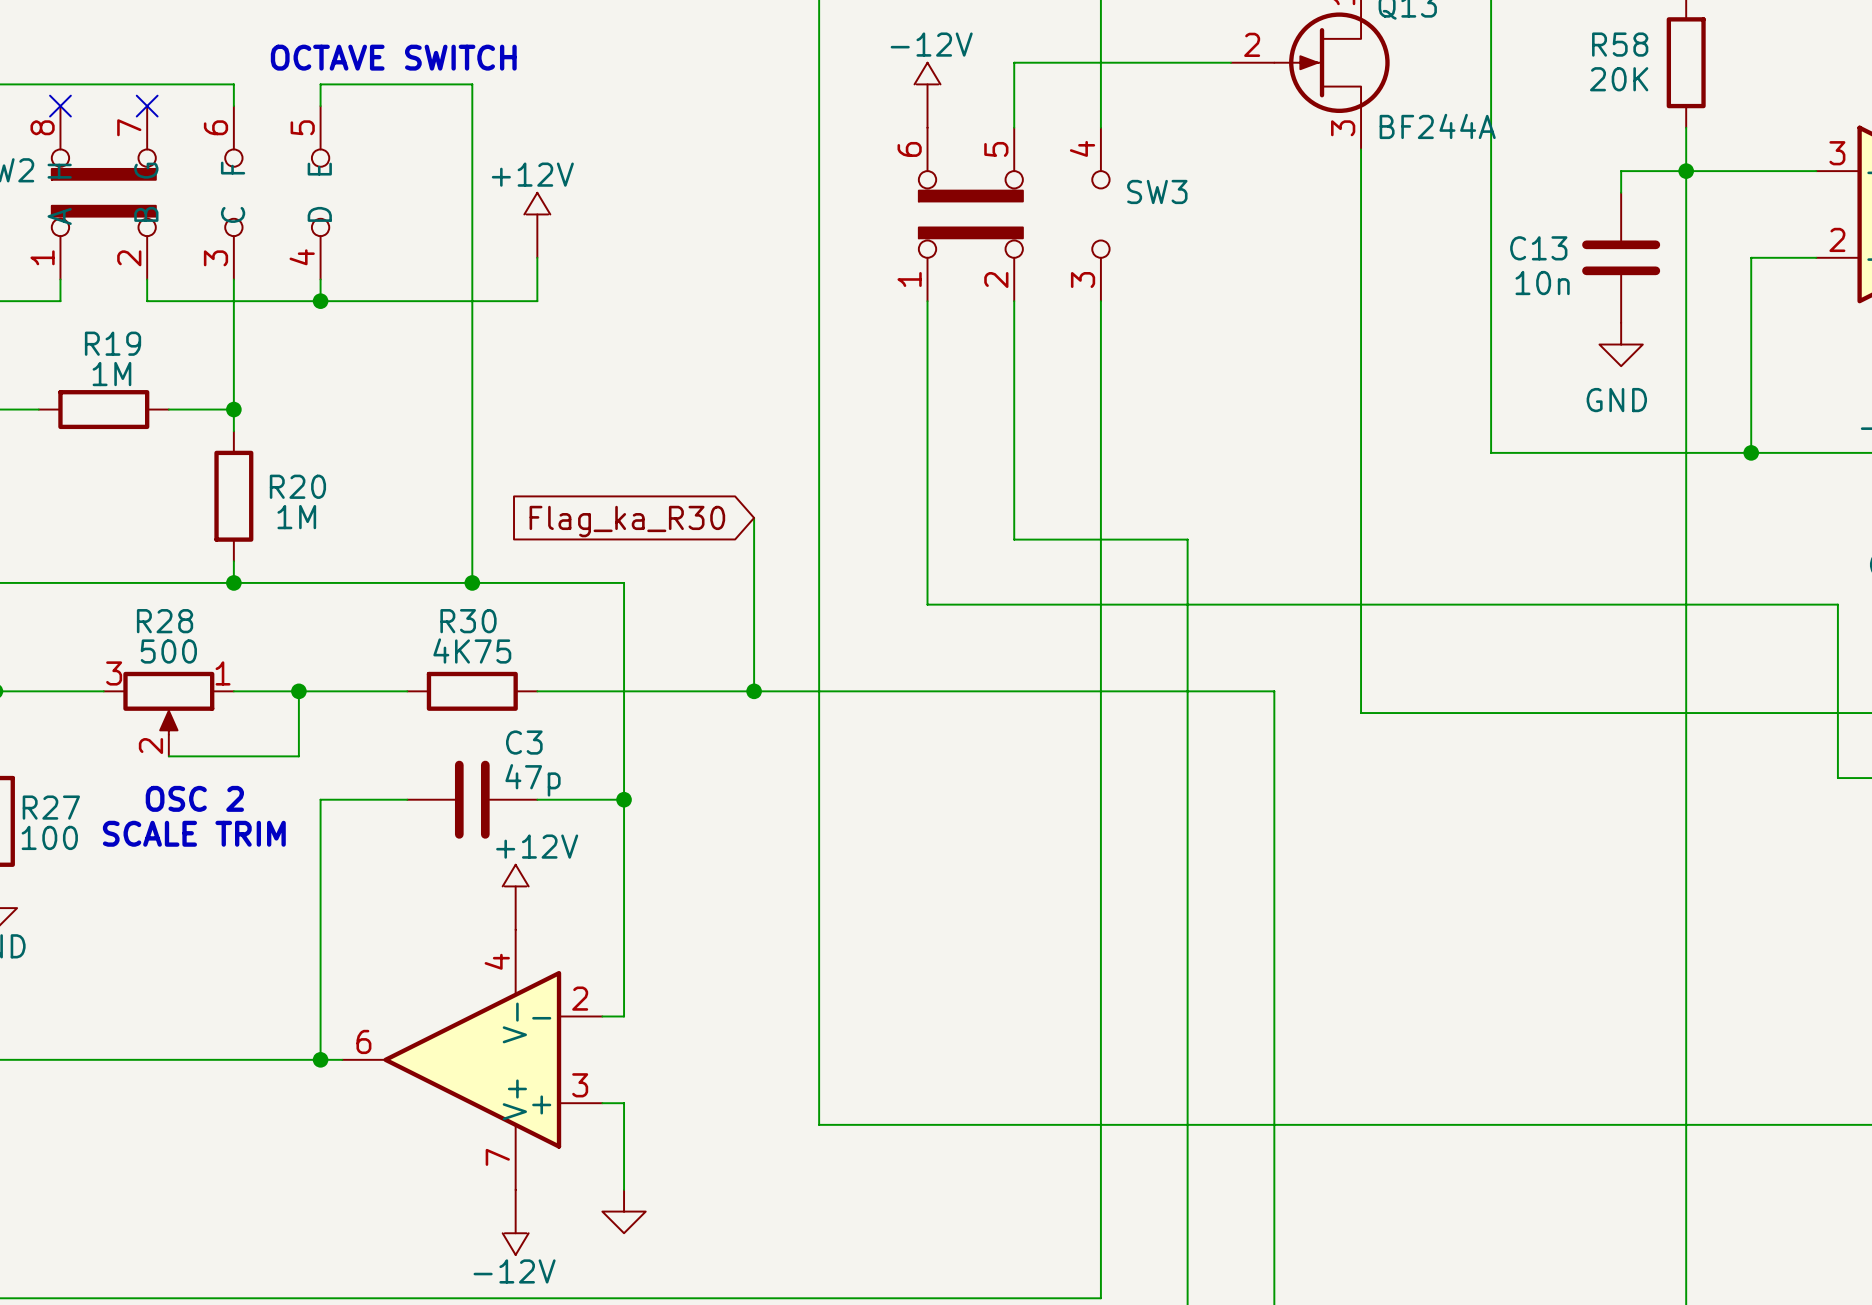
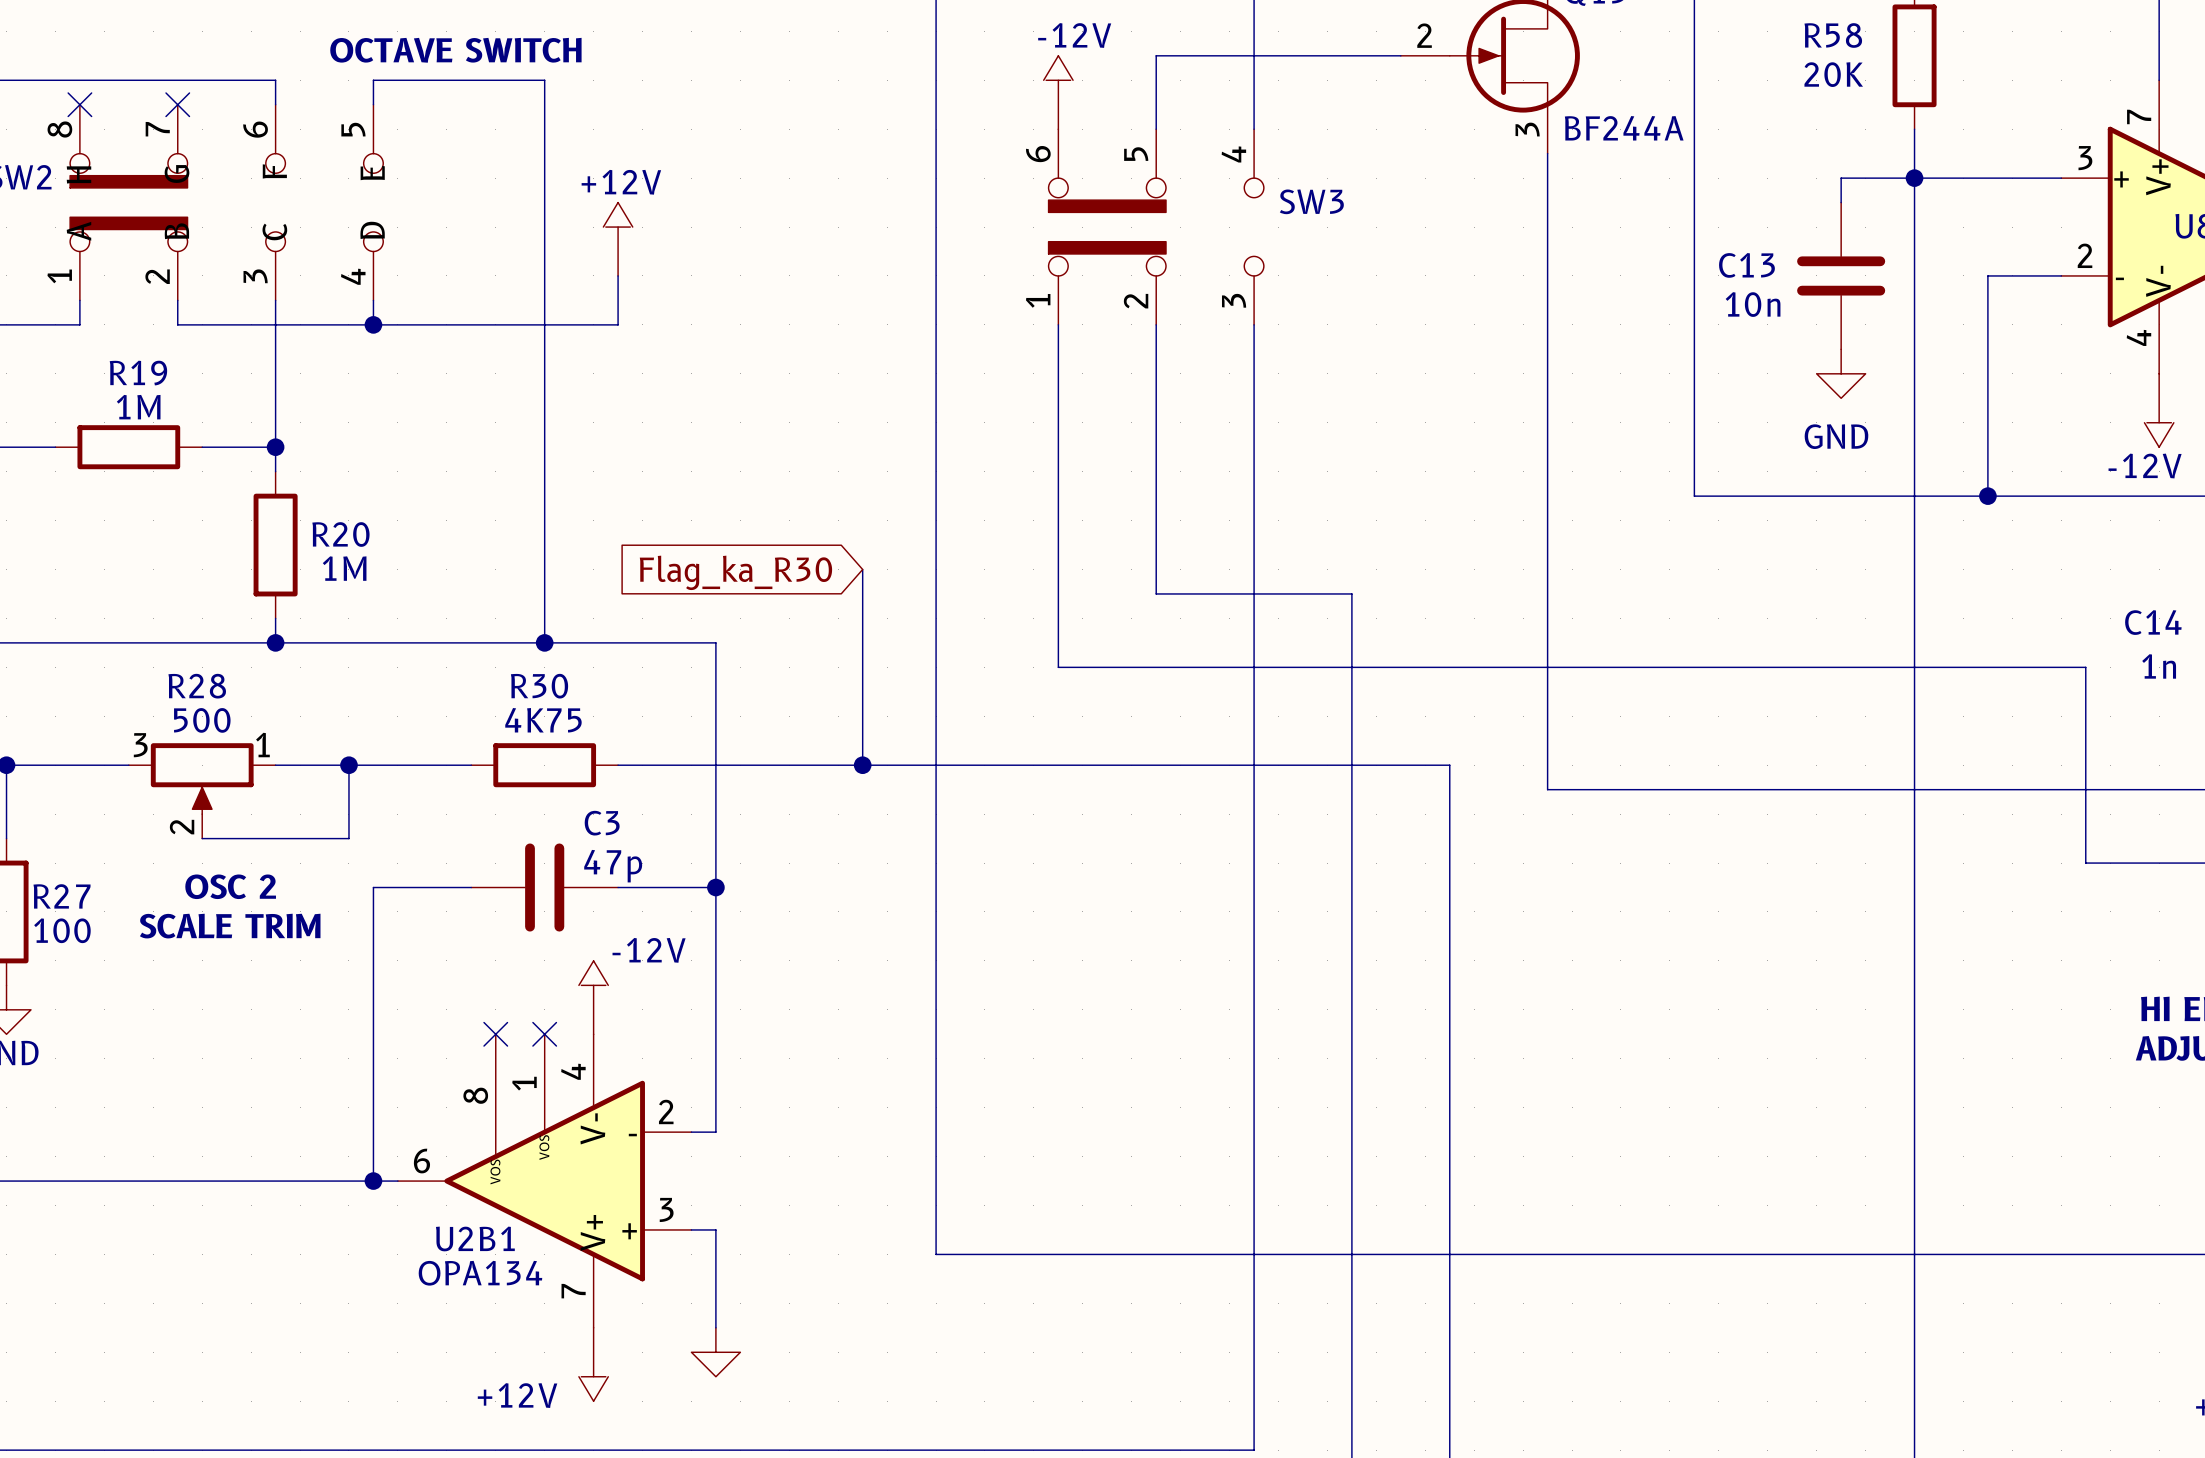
part value: +12V (537, 846) -> -12V (649, 950)
no-connect mark: none -> (495, 1034)
no-connect mark: none -> (544, 1034)
part: (472, 1059) -> none
U2B1: none -> OPA134 (544, 1181)
part value: -12V (514, 1271) -> +12V (517, 1395)

